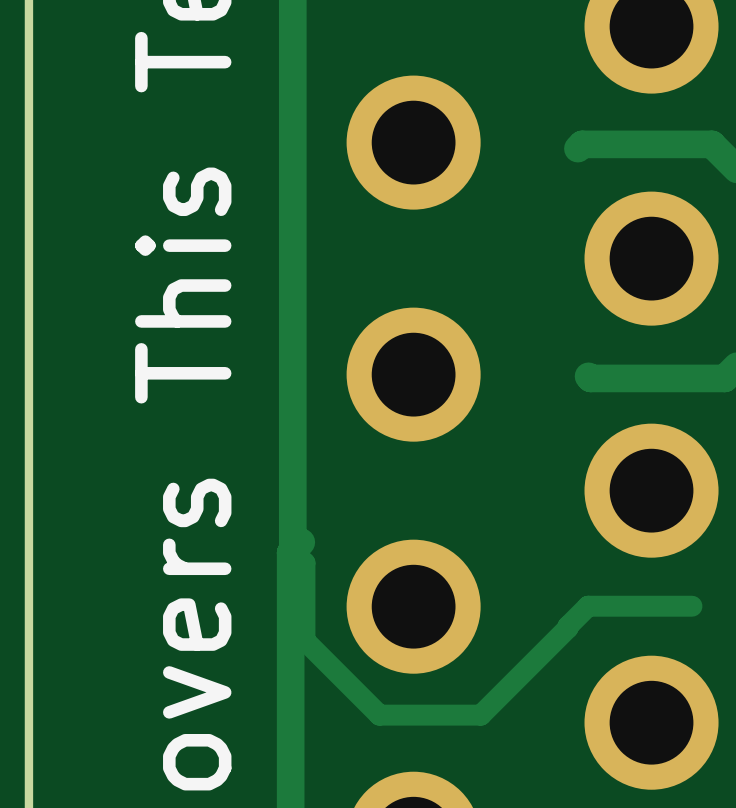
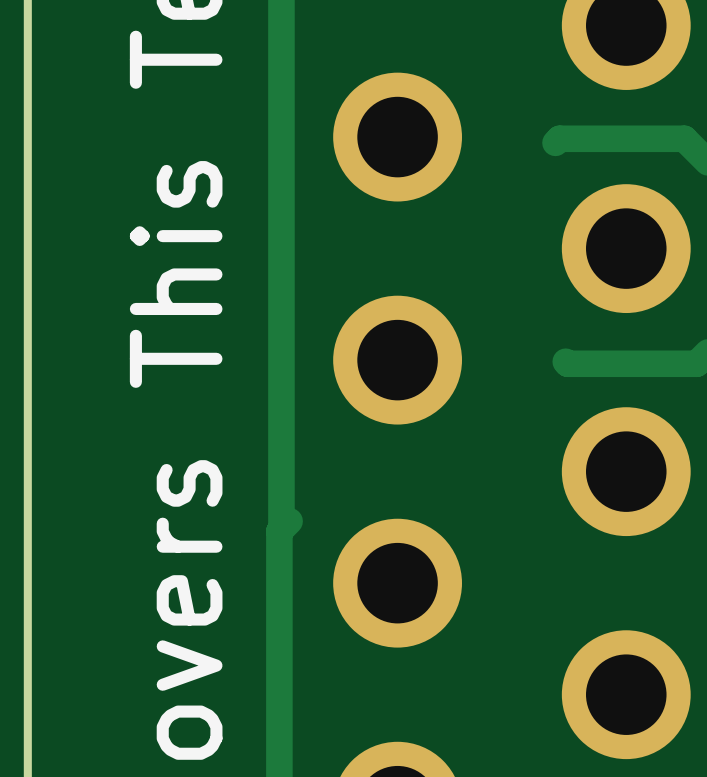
track: (292, 550) (304, 562) (304, 640) (379, 715) (480, 715) (567, 628) -> none
track: (691, 606) (588, 606) (567, 626) -> none

